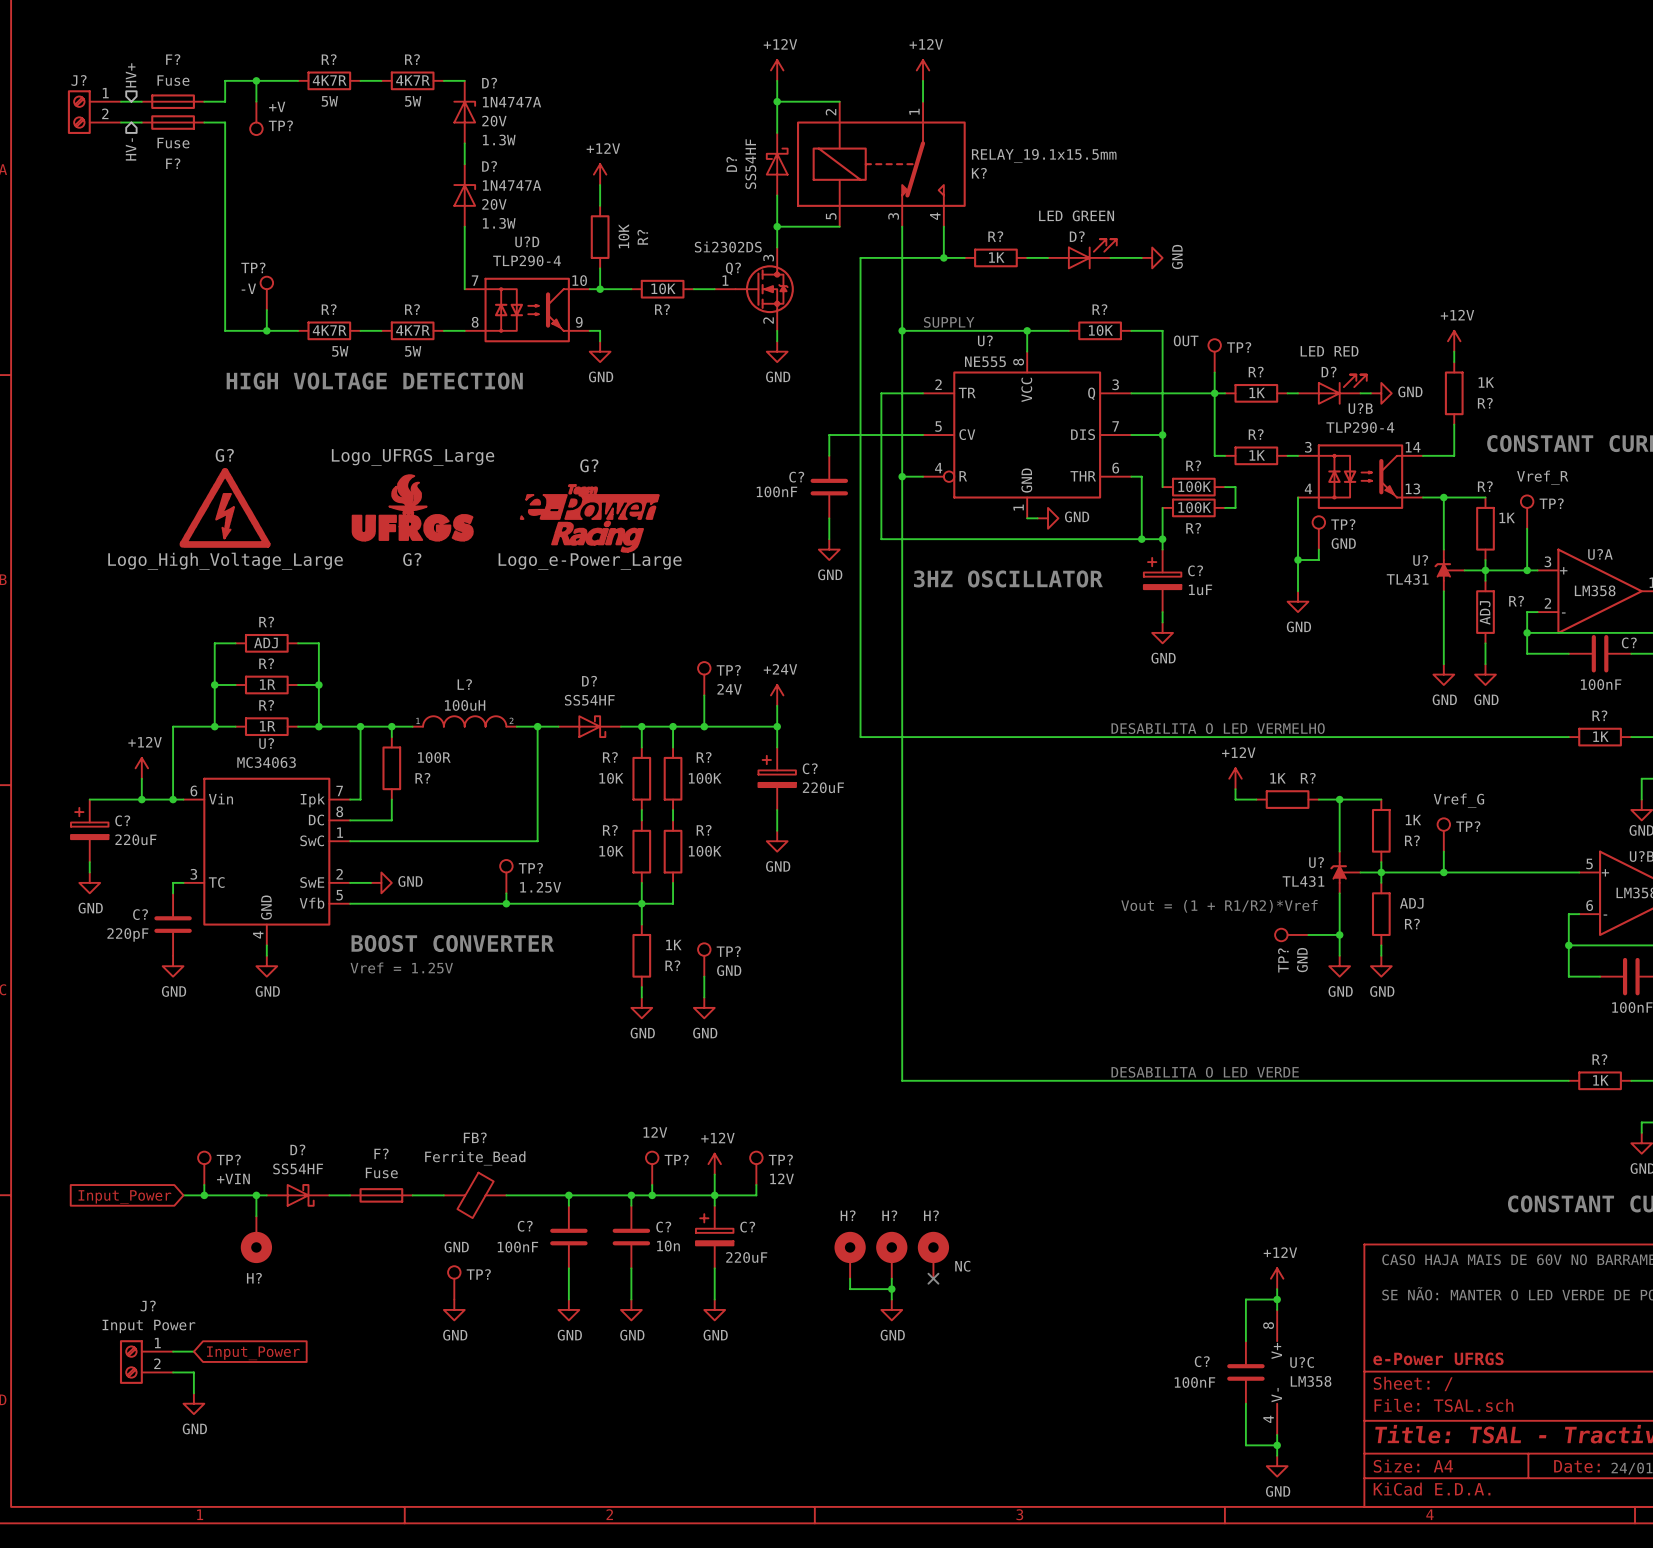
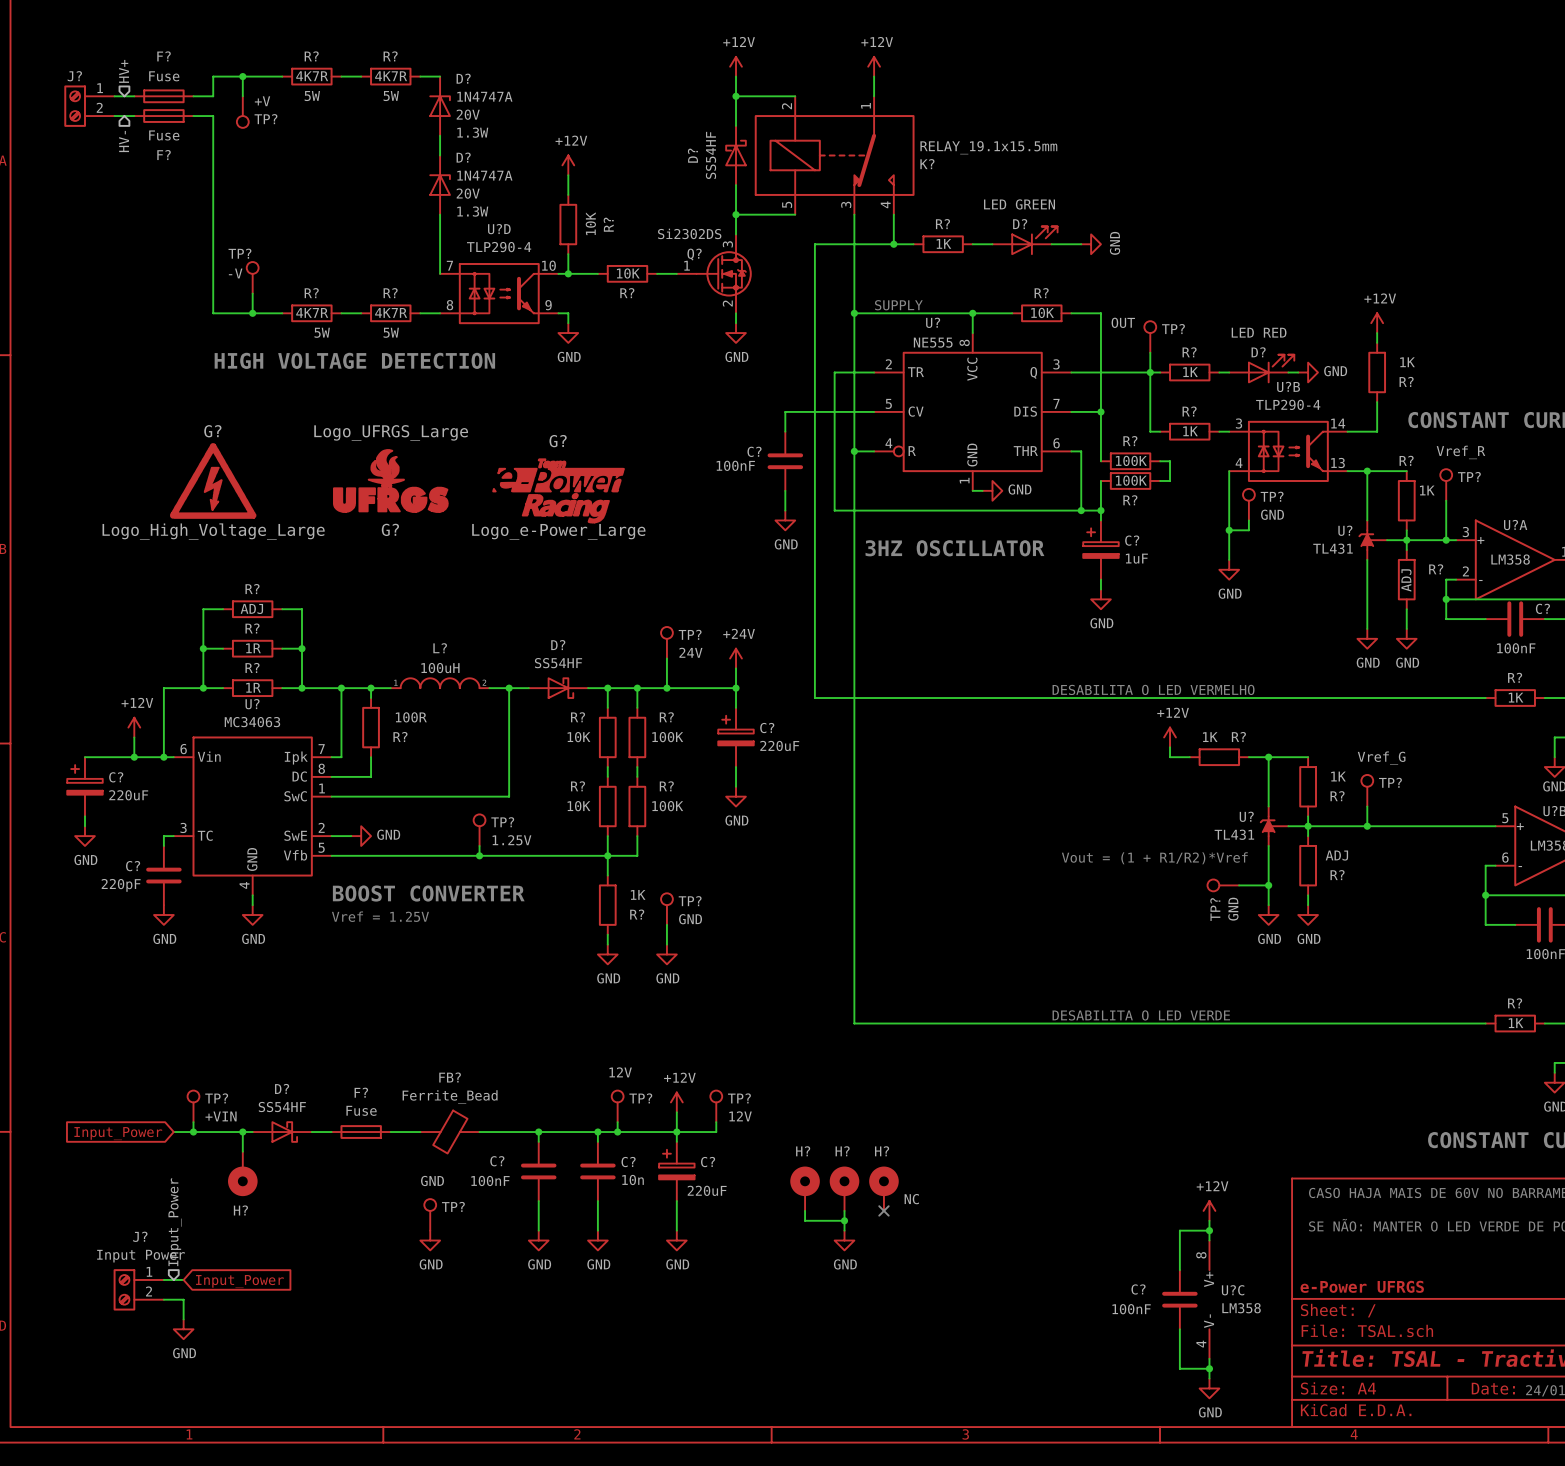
hierarchical label: none -> Input_Power (174, 1222)

